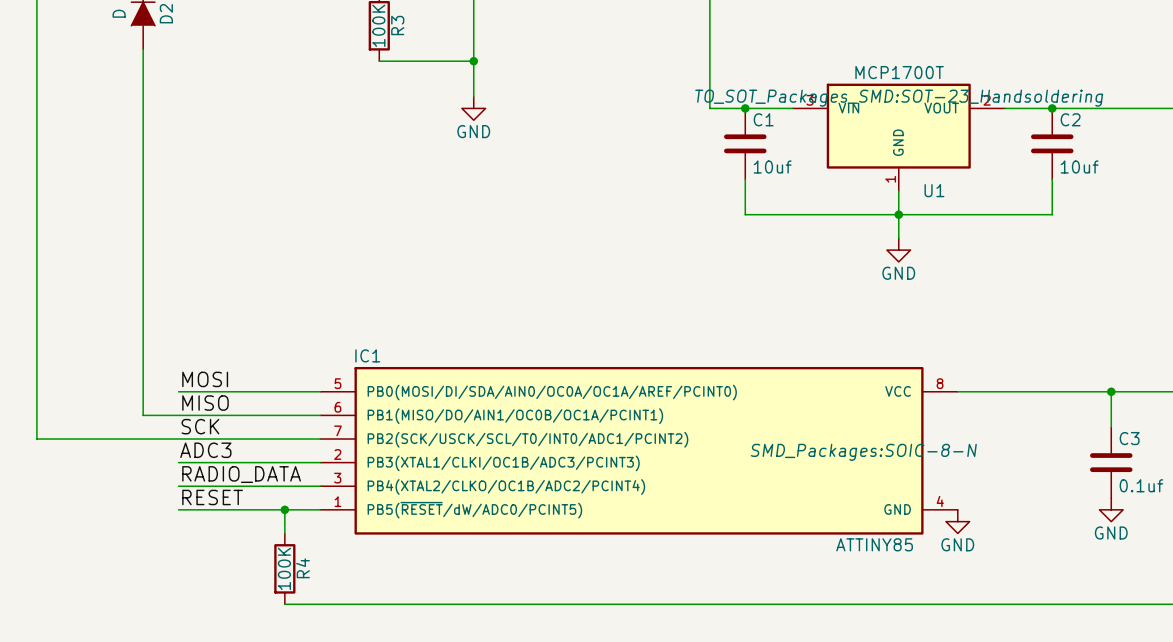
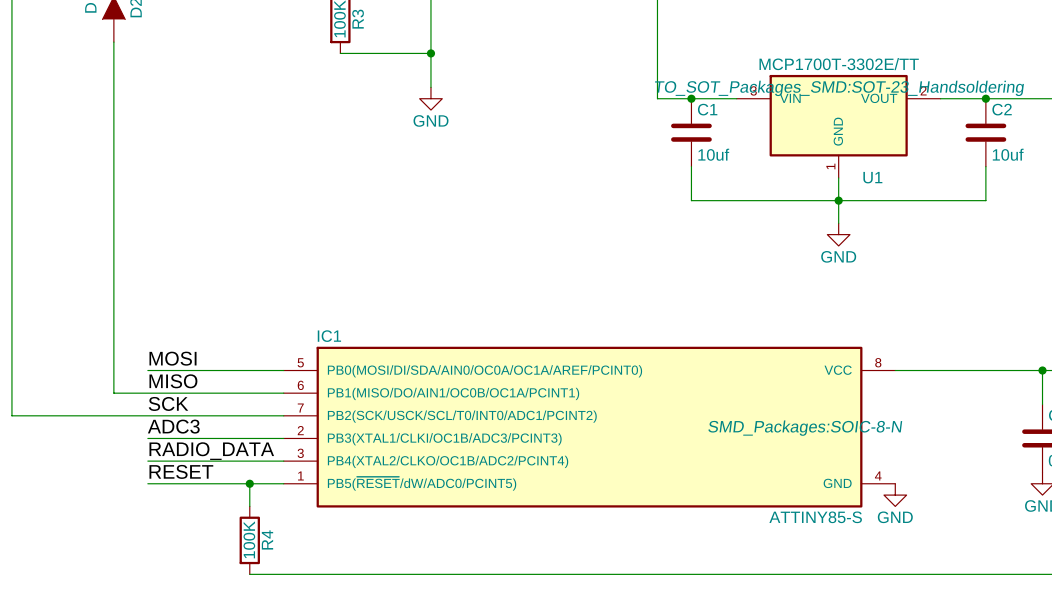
U1 value: MCP1700T (899, 72) -> MCP1700T-3302E/TT (839, 64)
IC1 value: ATTINY85 (874, 544) -> ATTINY85-S (815, 517)

